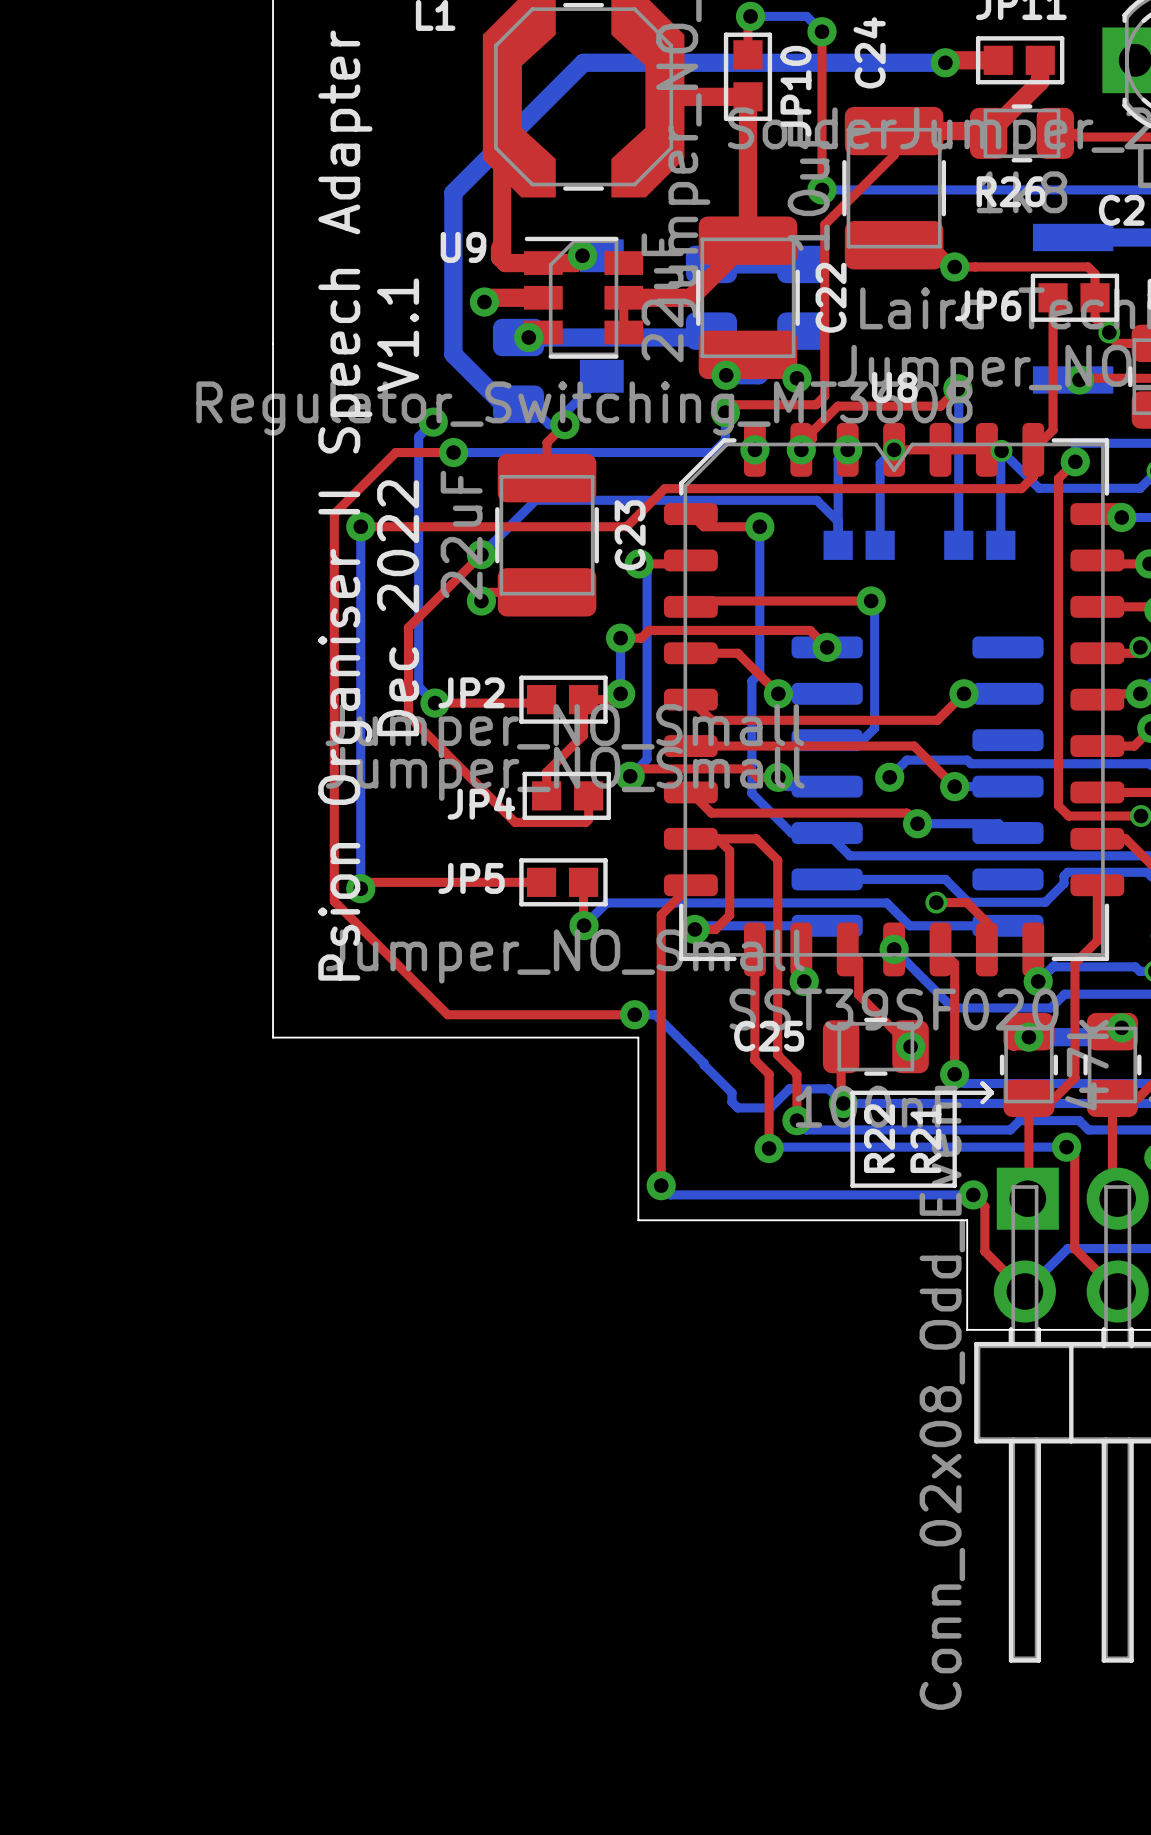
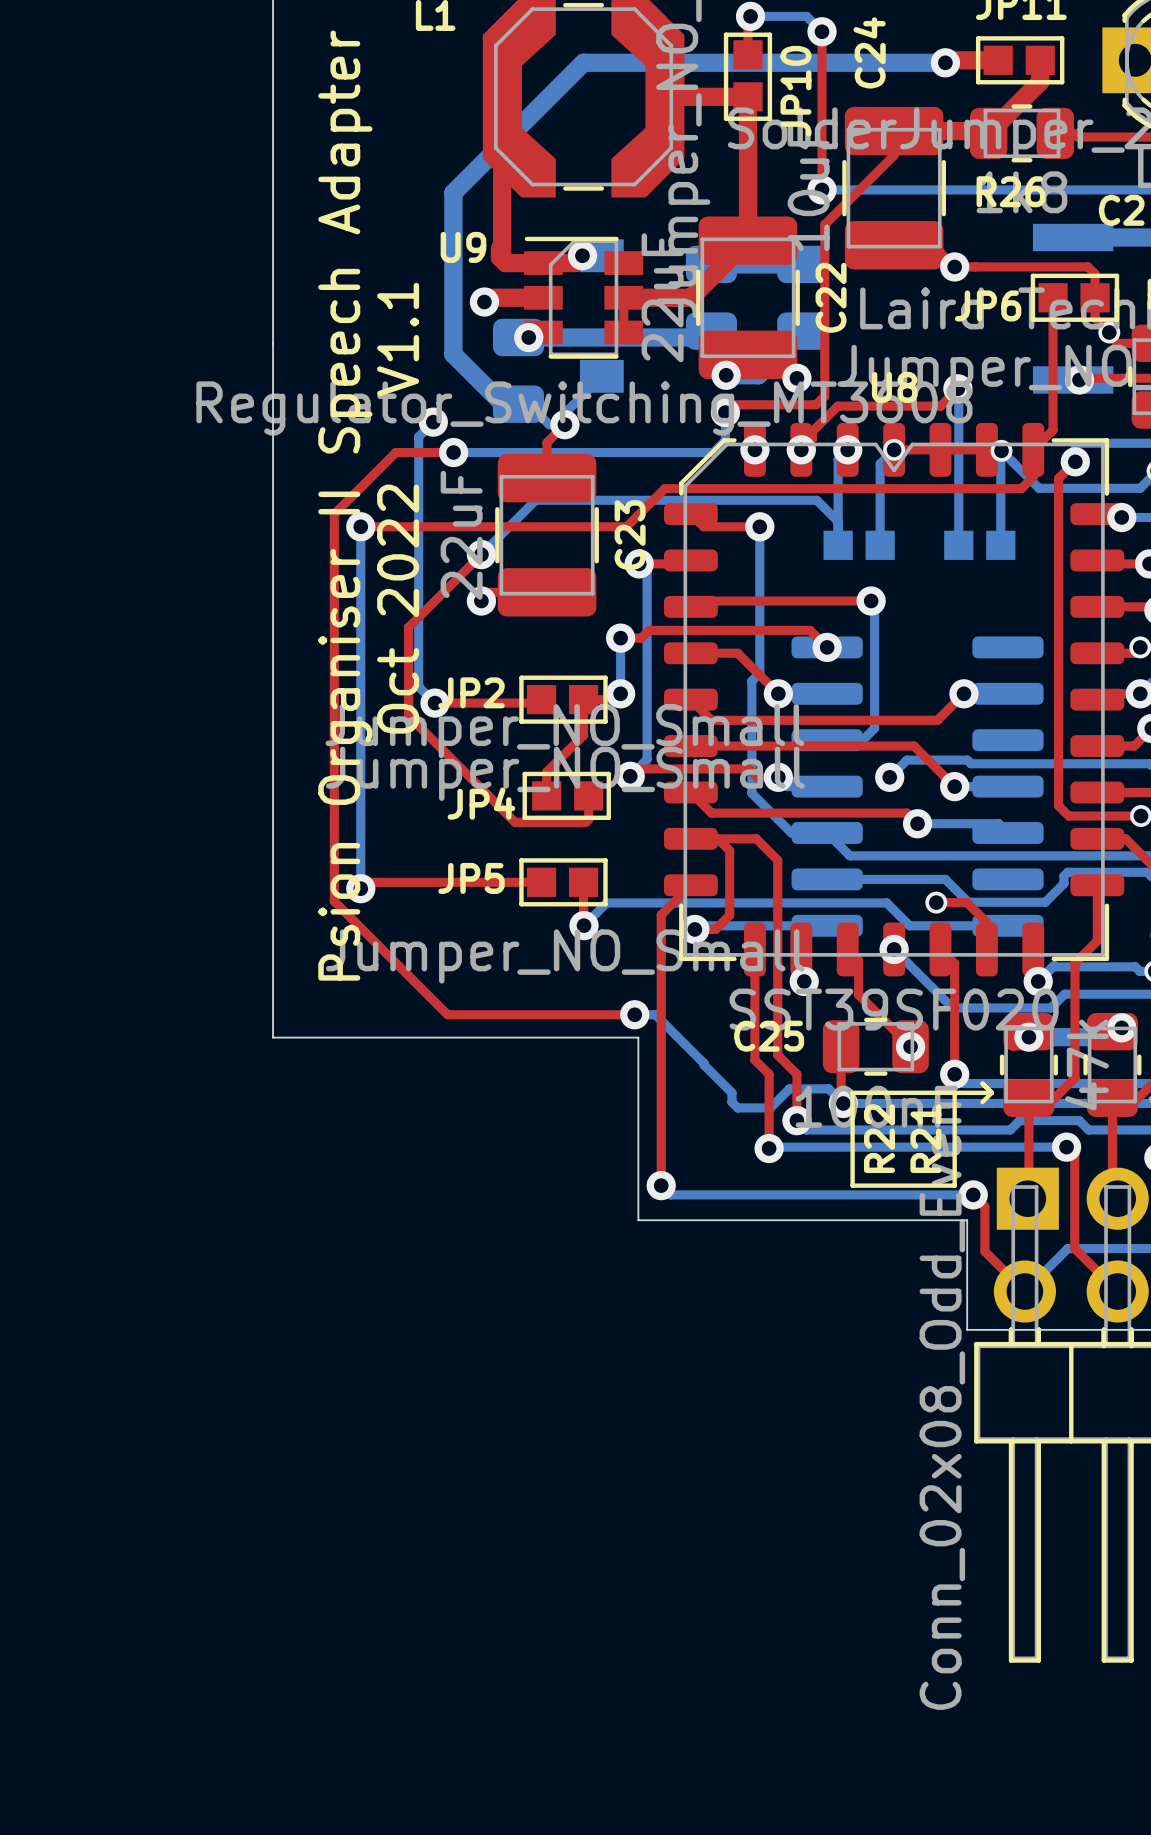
text: Dec 2022 V1.1 (398, 507) -> Oct 2022 V1.1 (398, 508)

